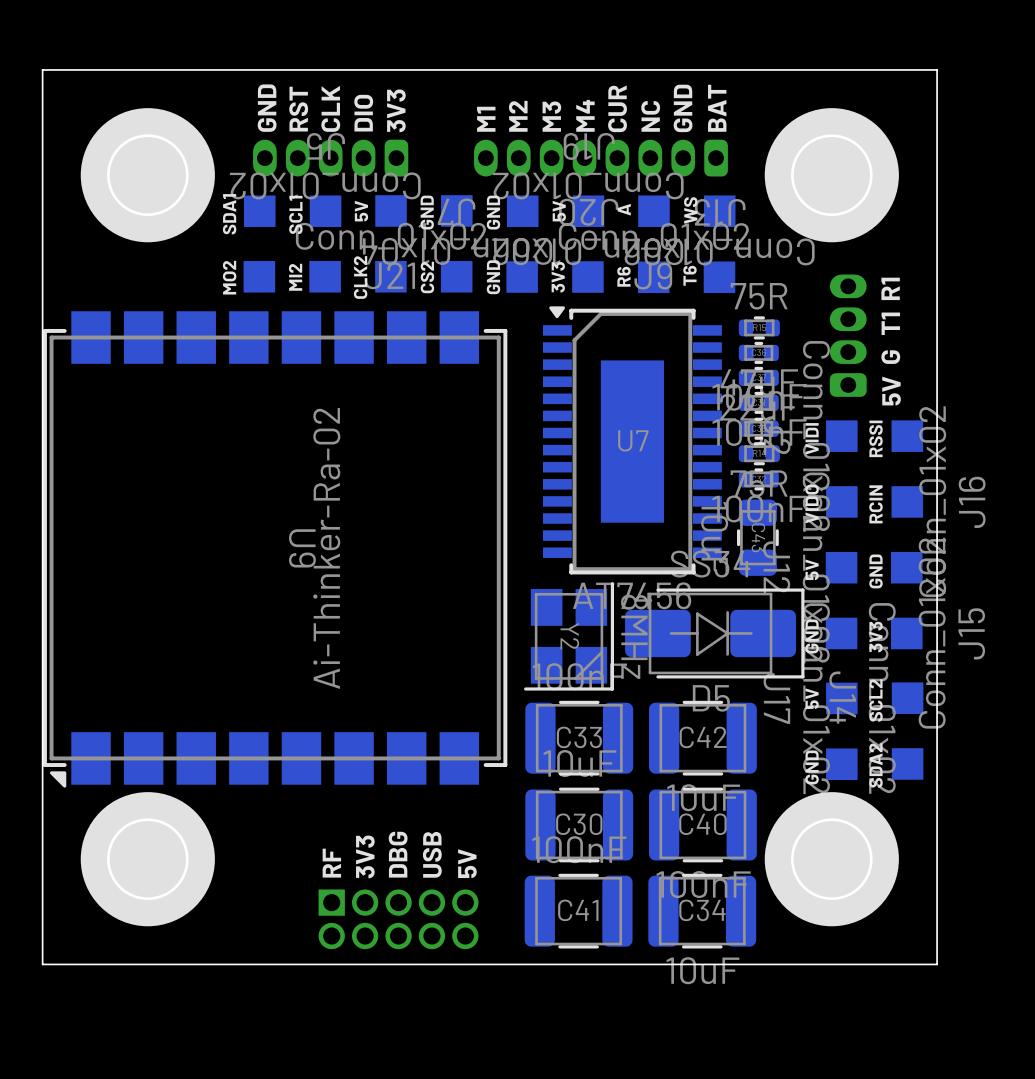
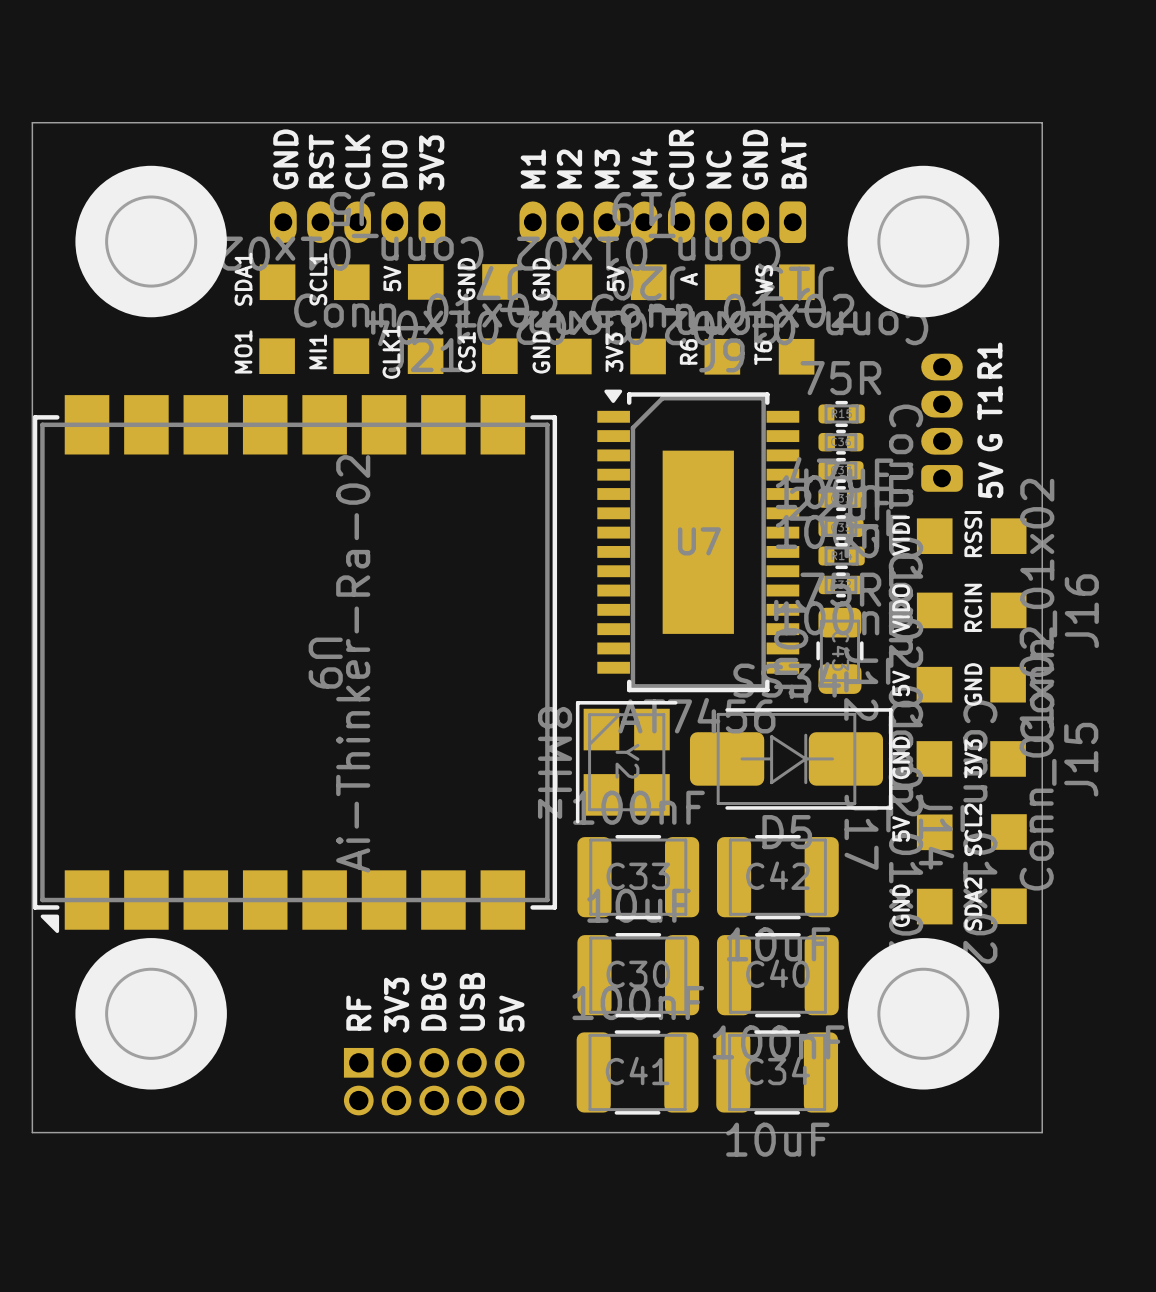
text: MO2 (229, 277) -> MO1 (243, 351)
text: MI2 (295, 277) -> MI1 (318, 351)
text: CLK2 (360, 277) -> CLK1 (391, 352)
text: CS2 (427, 277) -> CS1 (466, 352)
Y2 rotation: 0° (569, 636) -> 180° (626, 762)

